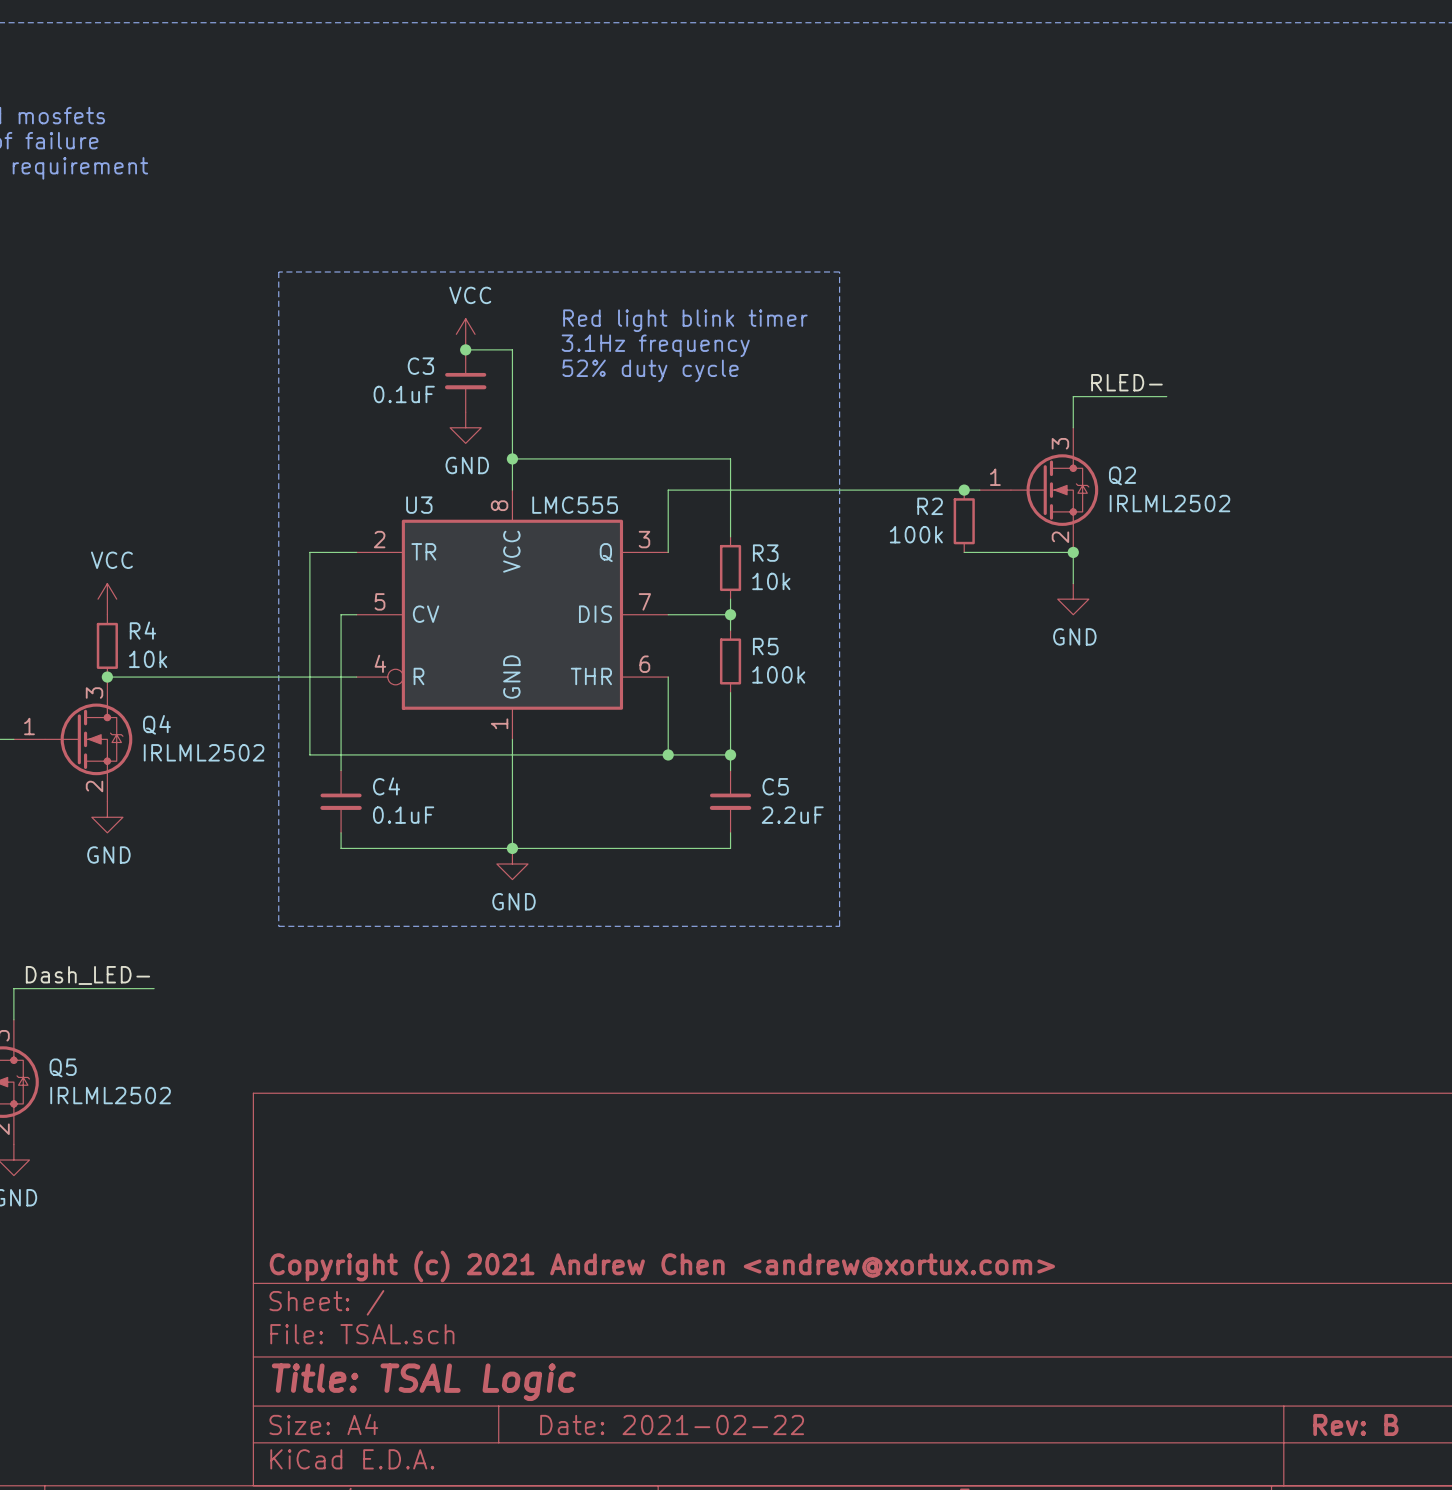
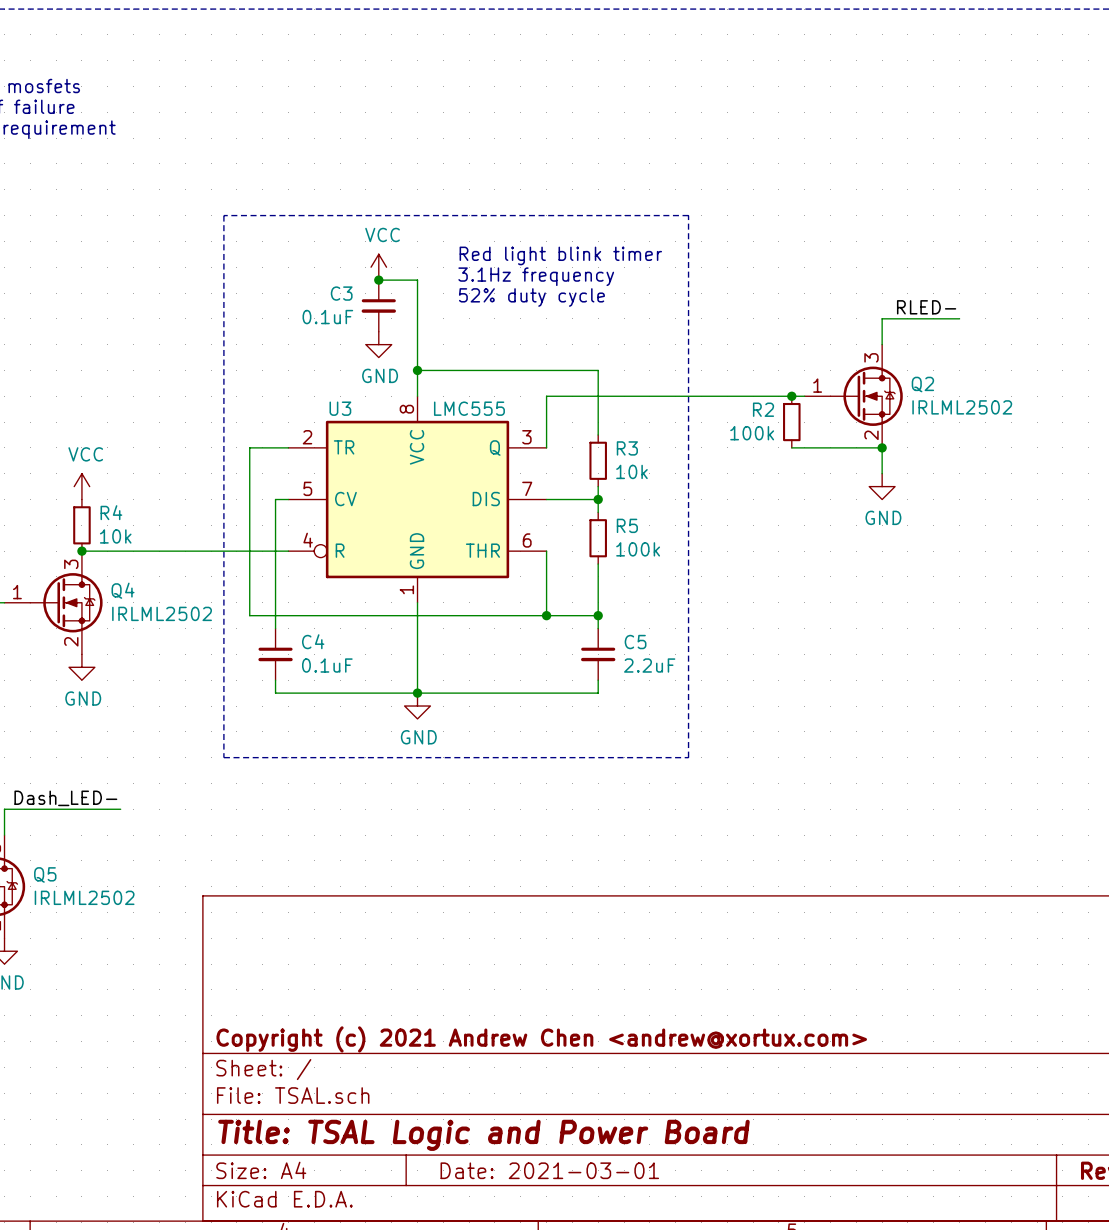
title block: Title: TSAL Logic (423, 1382) -> Title: TSAL Logic and Power Board (483, 1135)
title block: Date: 2021-02-22 (672, 1424) -> Date: 2021-03-01 (549, 1170)

